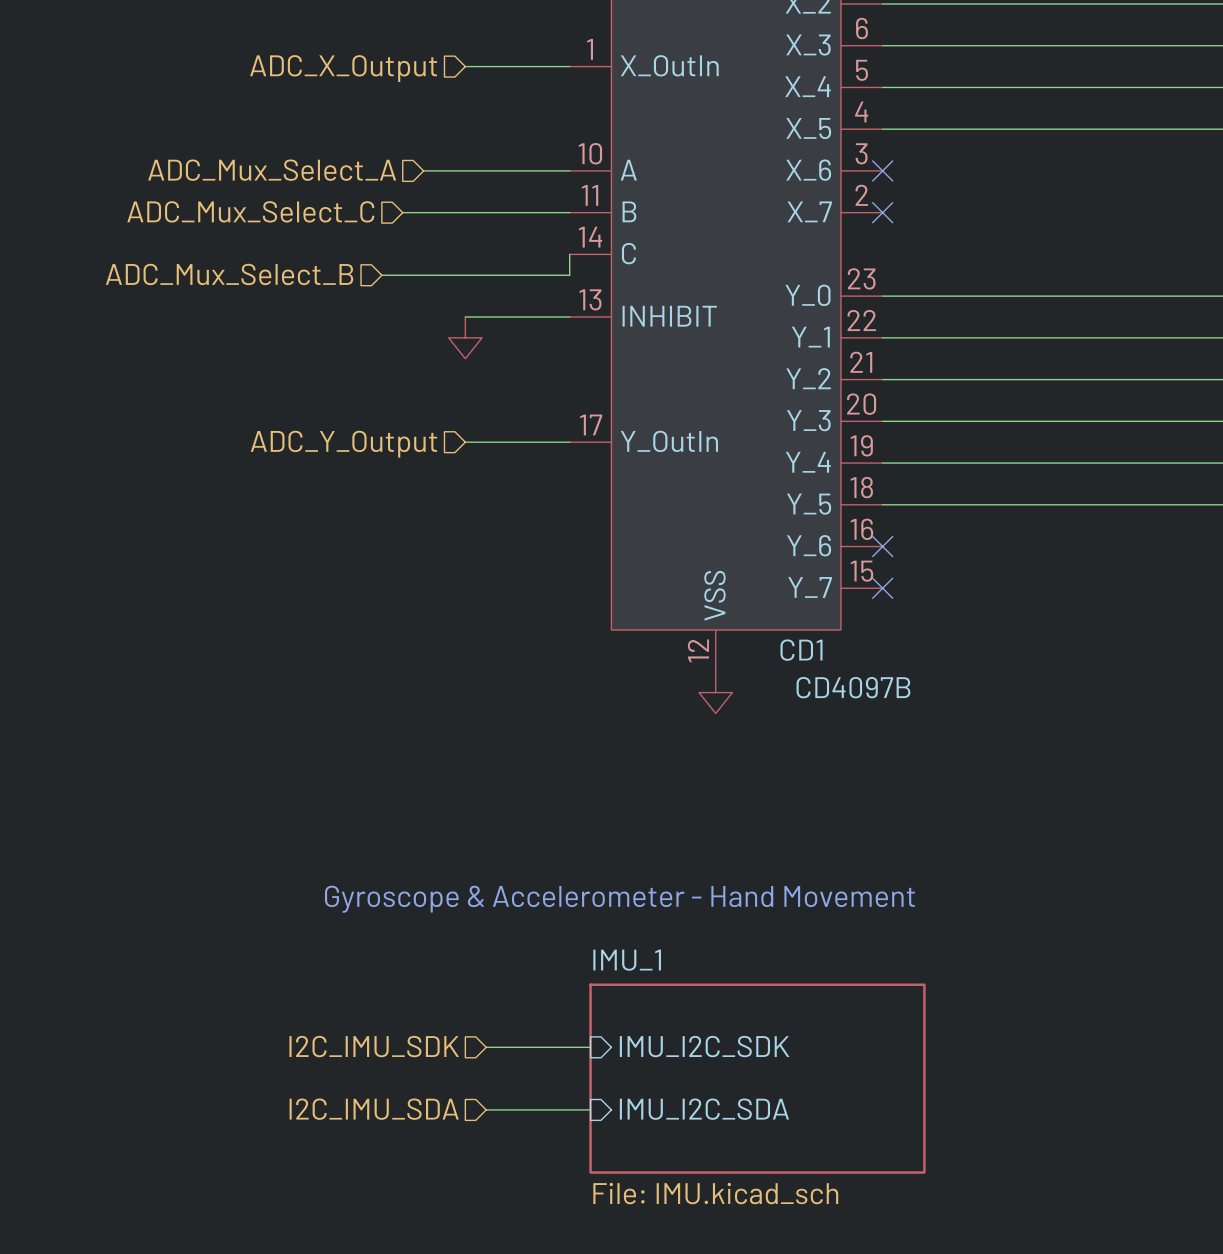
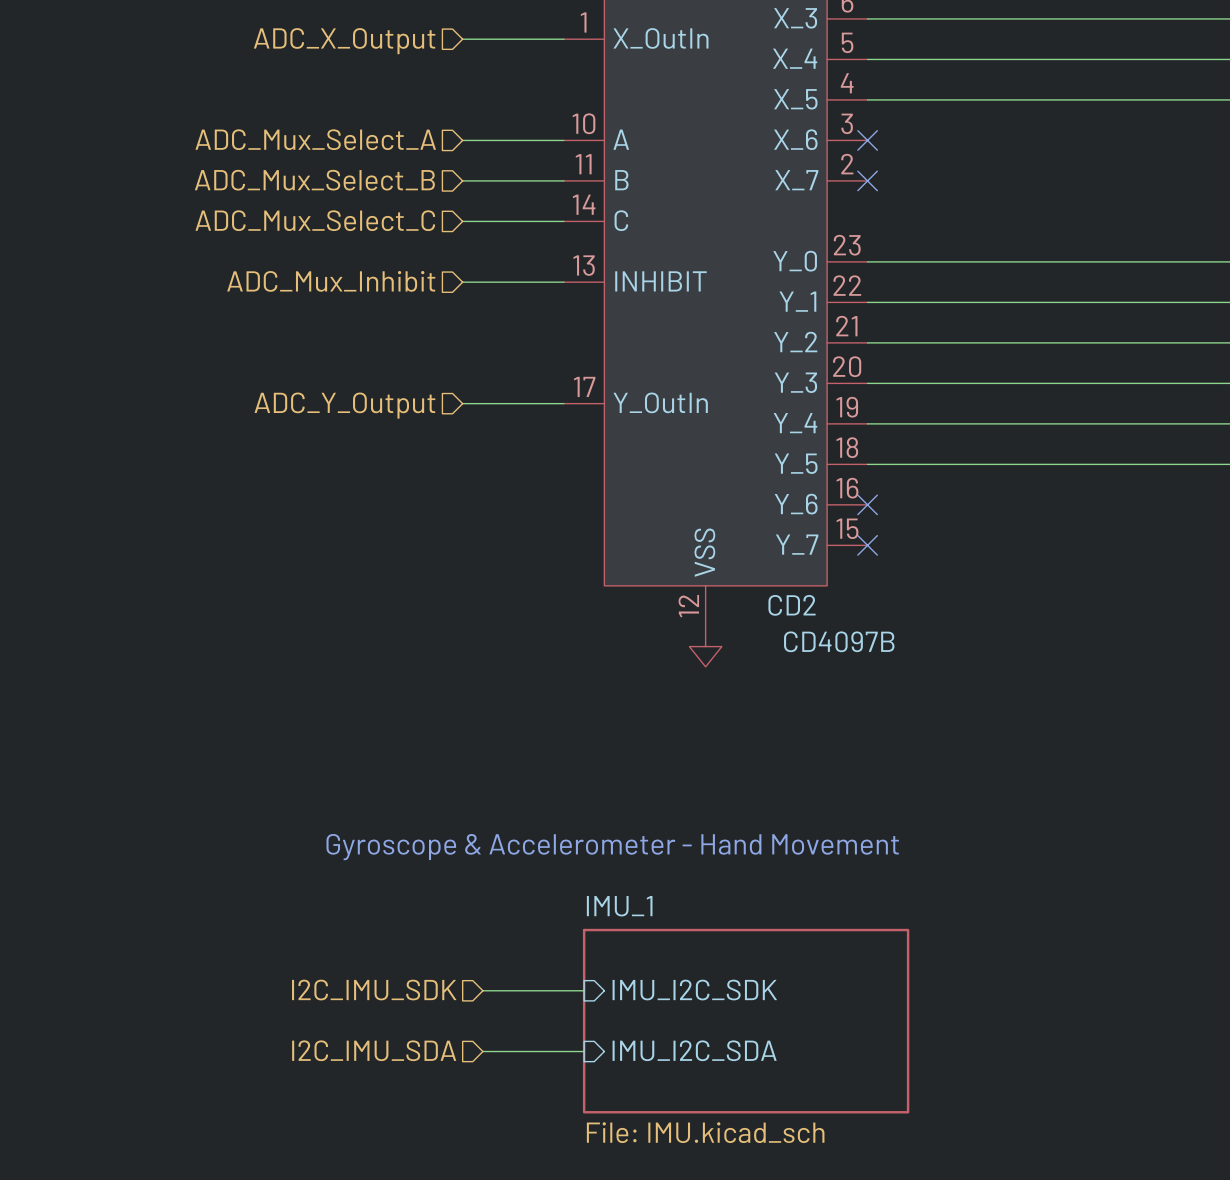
hierarchical label position: ADC_Mux_Select_A (272, 170) -> ADC_Mux_Select_A (315, 139)
wire: (423, 170) (465, 170) -> none
hierarchical label position: ADC_Mux_Select_C (250, 211) -> ADC_Mux_Select_C (315, 220)
wire: (402, 212) (465, 212) -> none
wire: (569, 254) (569, 275) (381, 275) -> (563, 221) (462, 221)
hierarchical label position: ADC_Mux_Select_B (229, 274) -> ADC_Mux_Select_B (314, 180)
hierarchical label: none -> ADC_Mux_Inhibit (331, 281)
power symbol: (465, 337) -> none
CD1 name: CD1 (801, 650) -> CD2 (792, 605)

